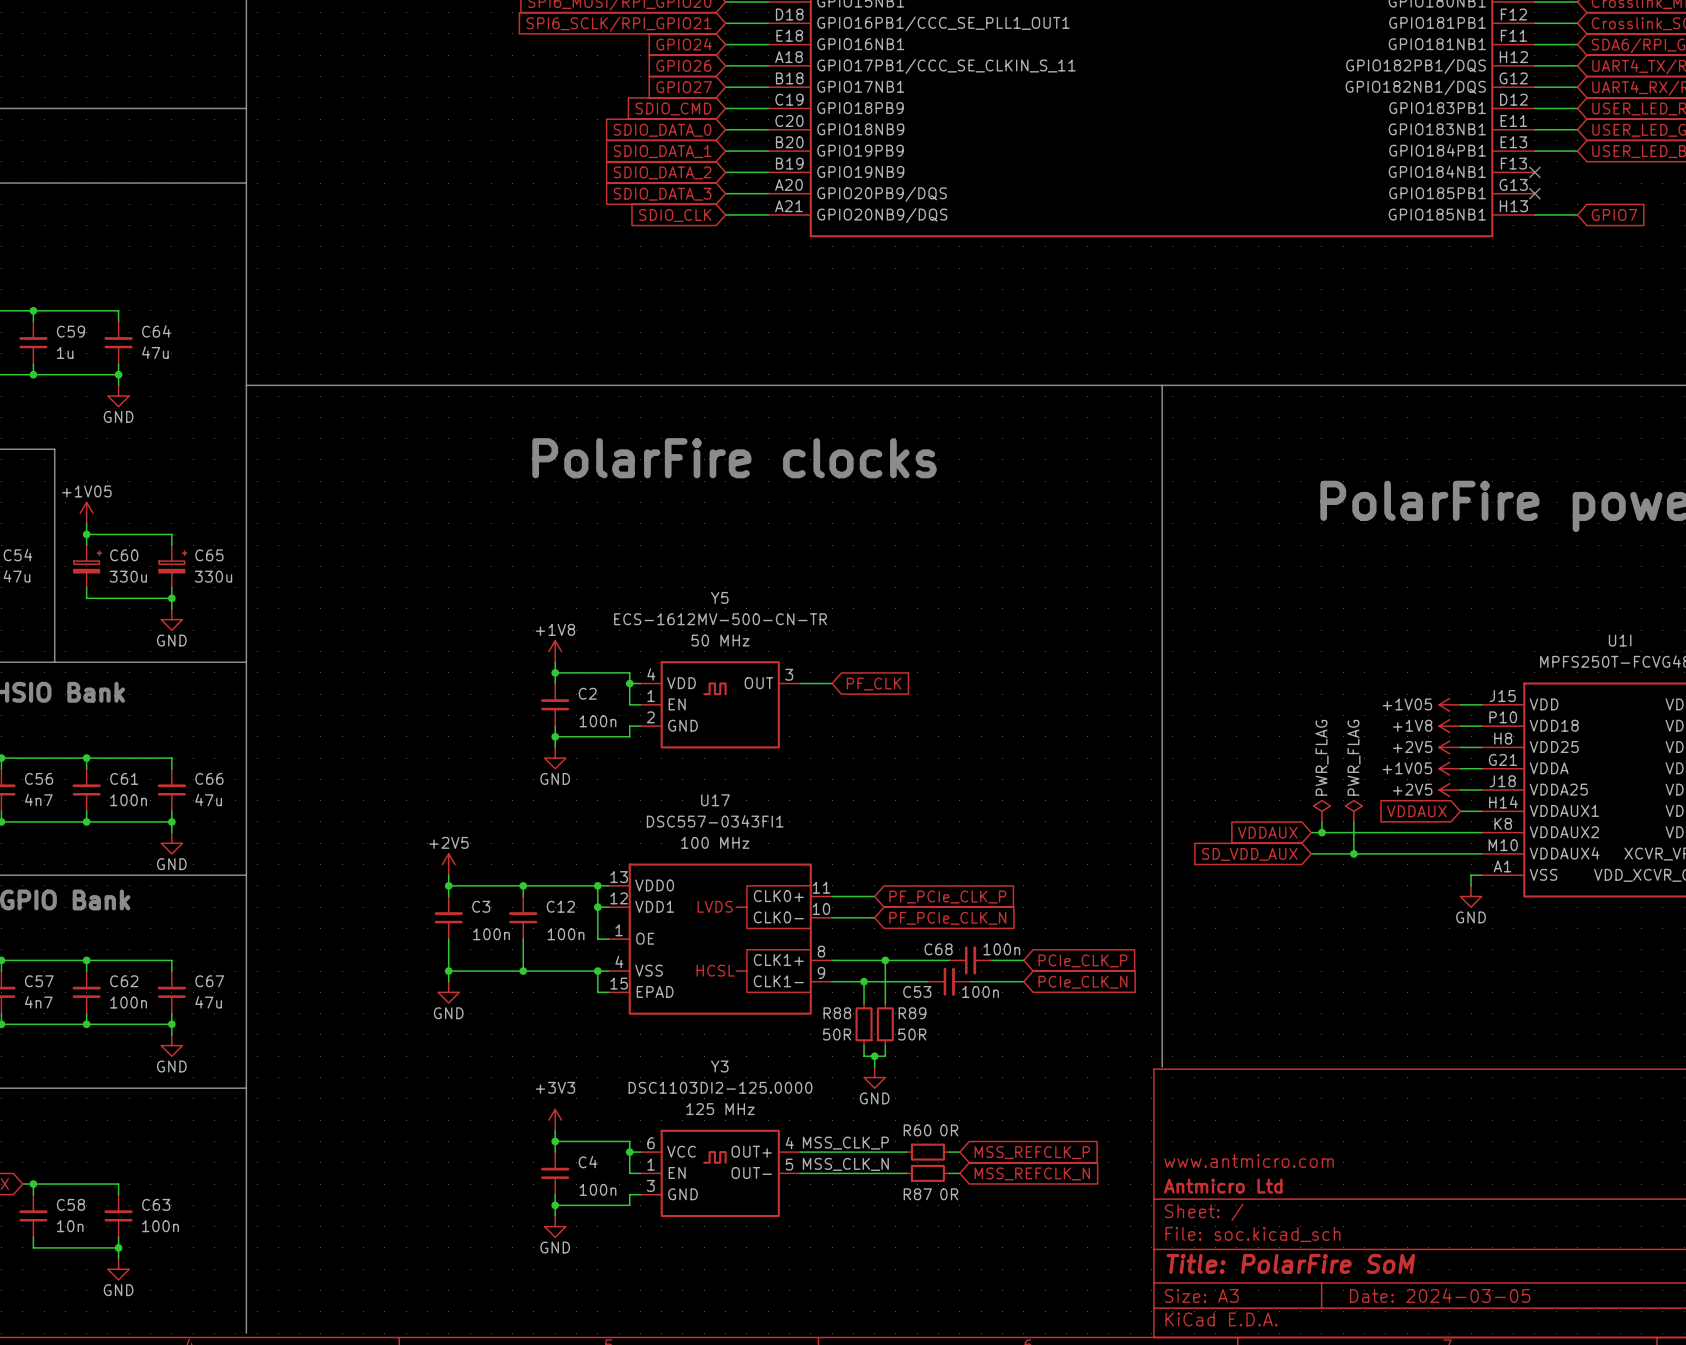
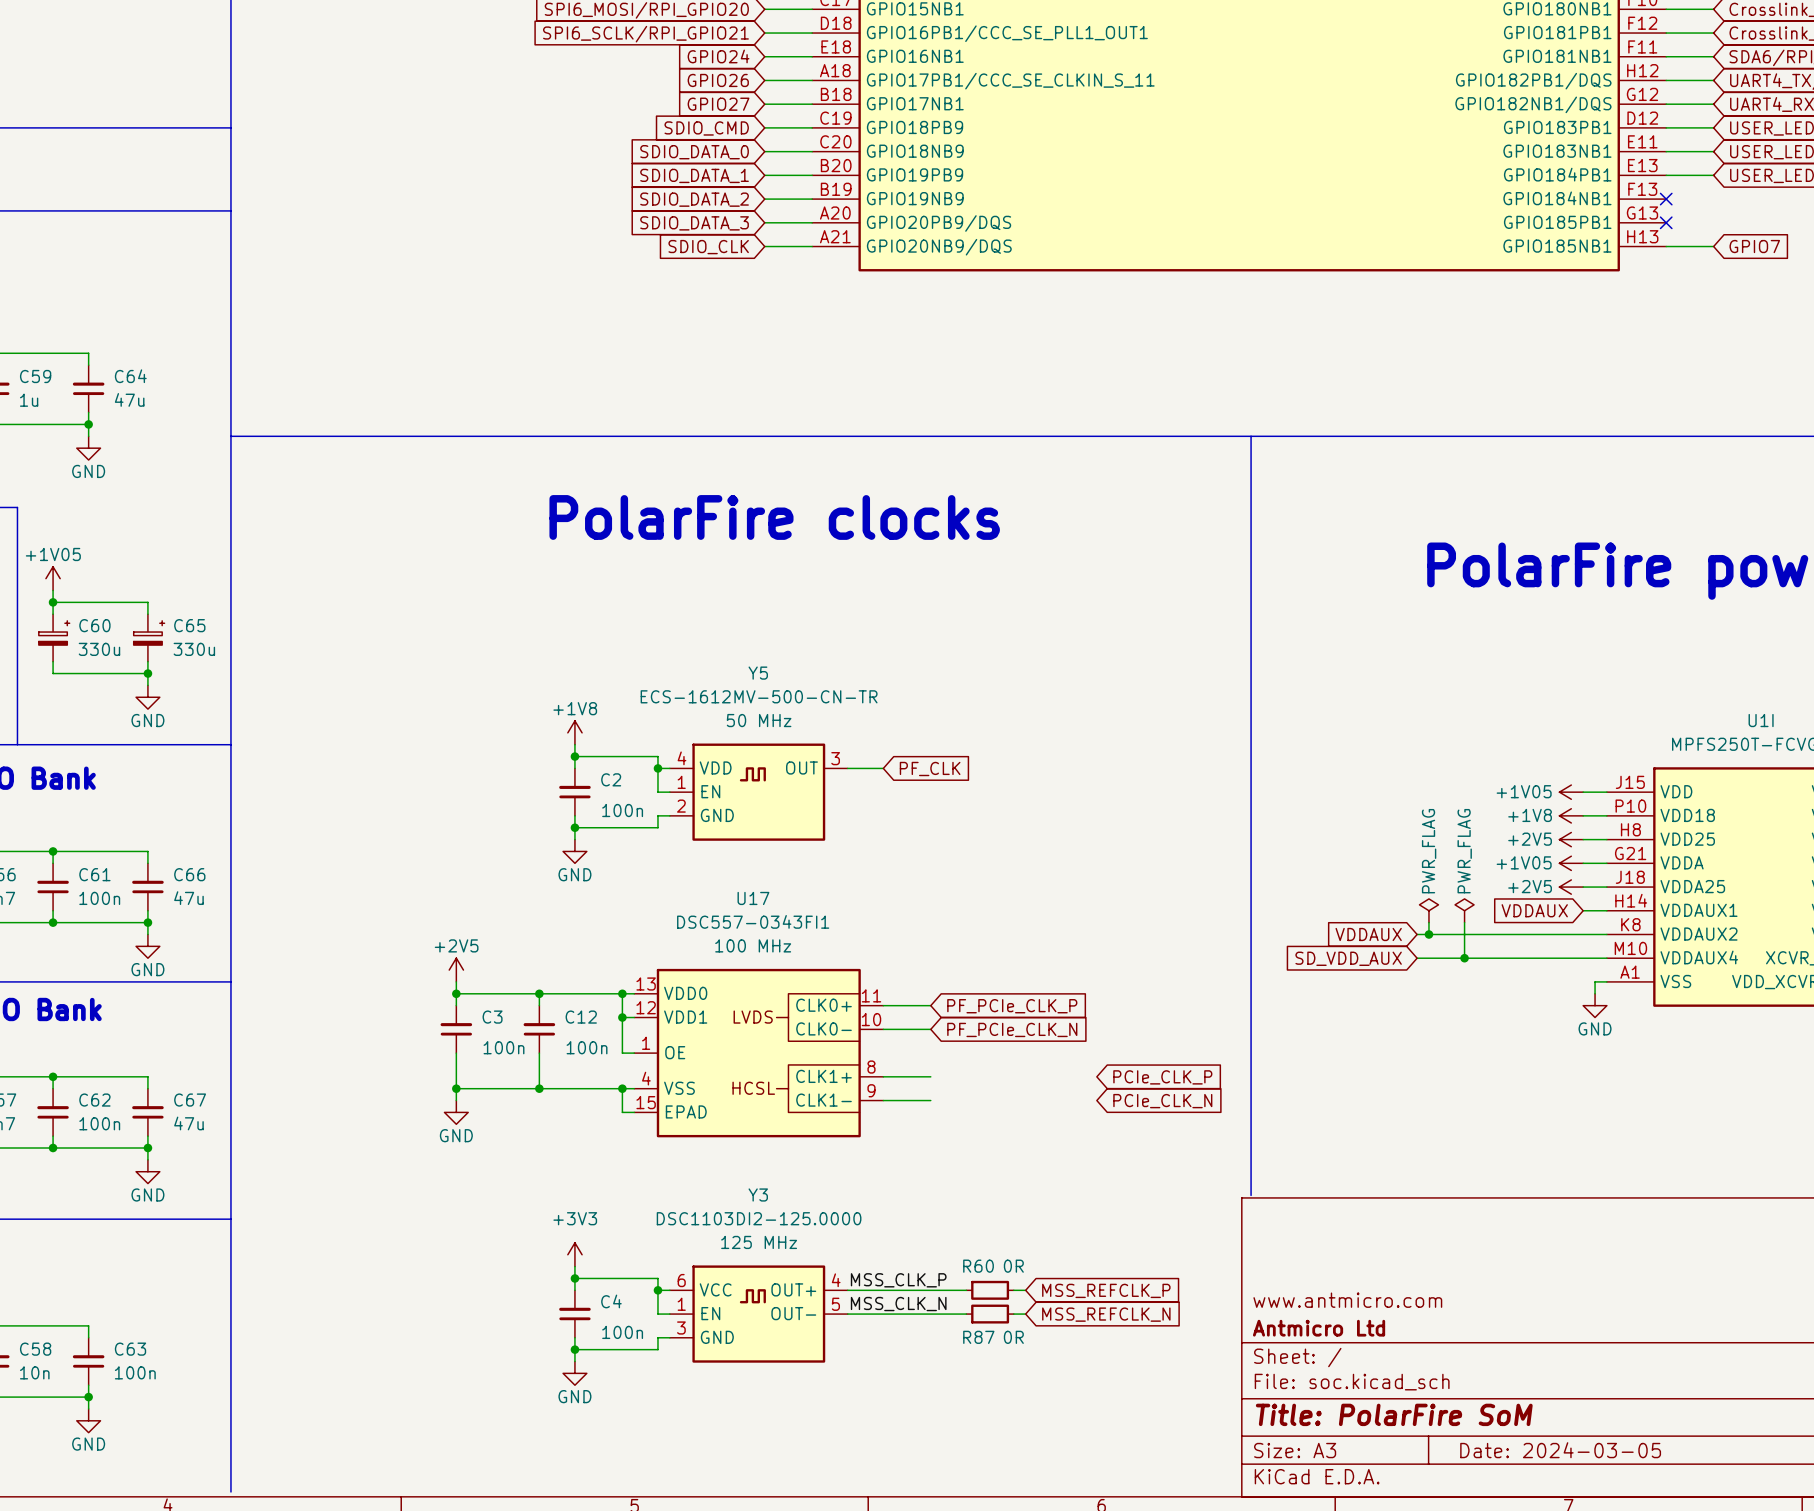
wire: (874, 960) (949, 960) -> none
wire: (885, 960) (885, 1003) -> none
junction: (885, 960) -> none
C68: (970, 960) -> none
wire: (991, 960) (1023, 960) -> none
wire: (864, 981) (864, 1003) -> none
junction: (864, 981) -> none
wire: (874, 981) (927, 981) -> none
C53: (949, 981) -> none
wire: (970, 981) (1023, 981) -> none
R88: (864, 1024) -> none
R89: (885, 1024) -> none
wire: (864, 1045) (864, 1056) (885, 1056) (885, 1045) -> none
wire: (874, 1056) (874, 1066) -> none
junction: (874, 1056) -> none
power symbol: GND (874, 1077) -> none

